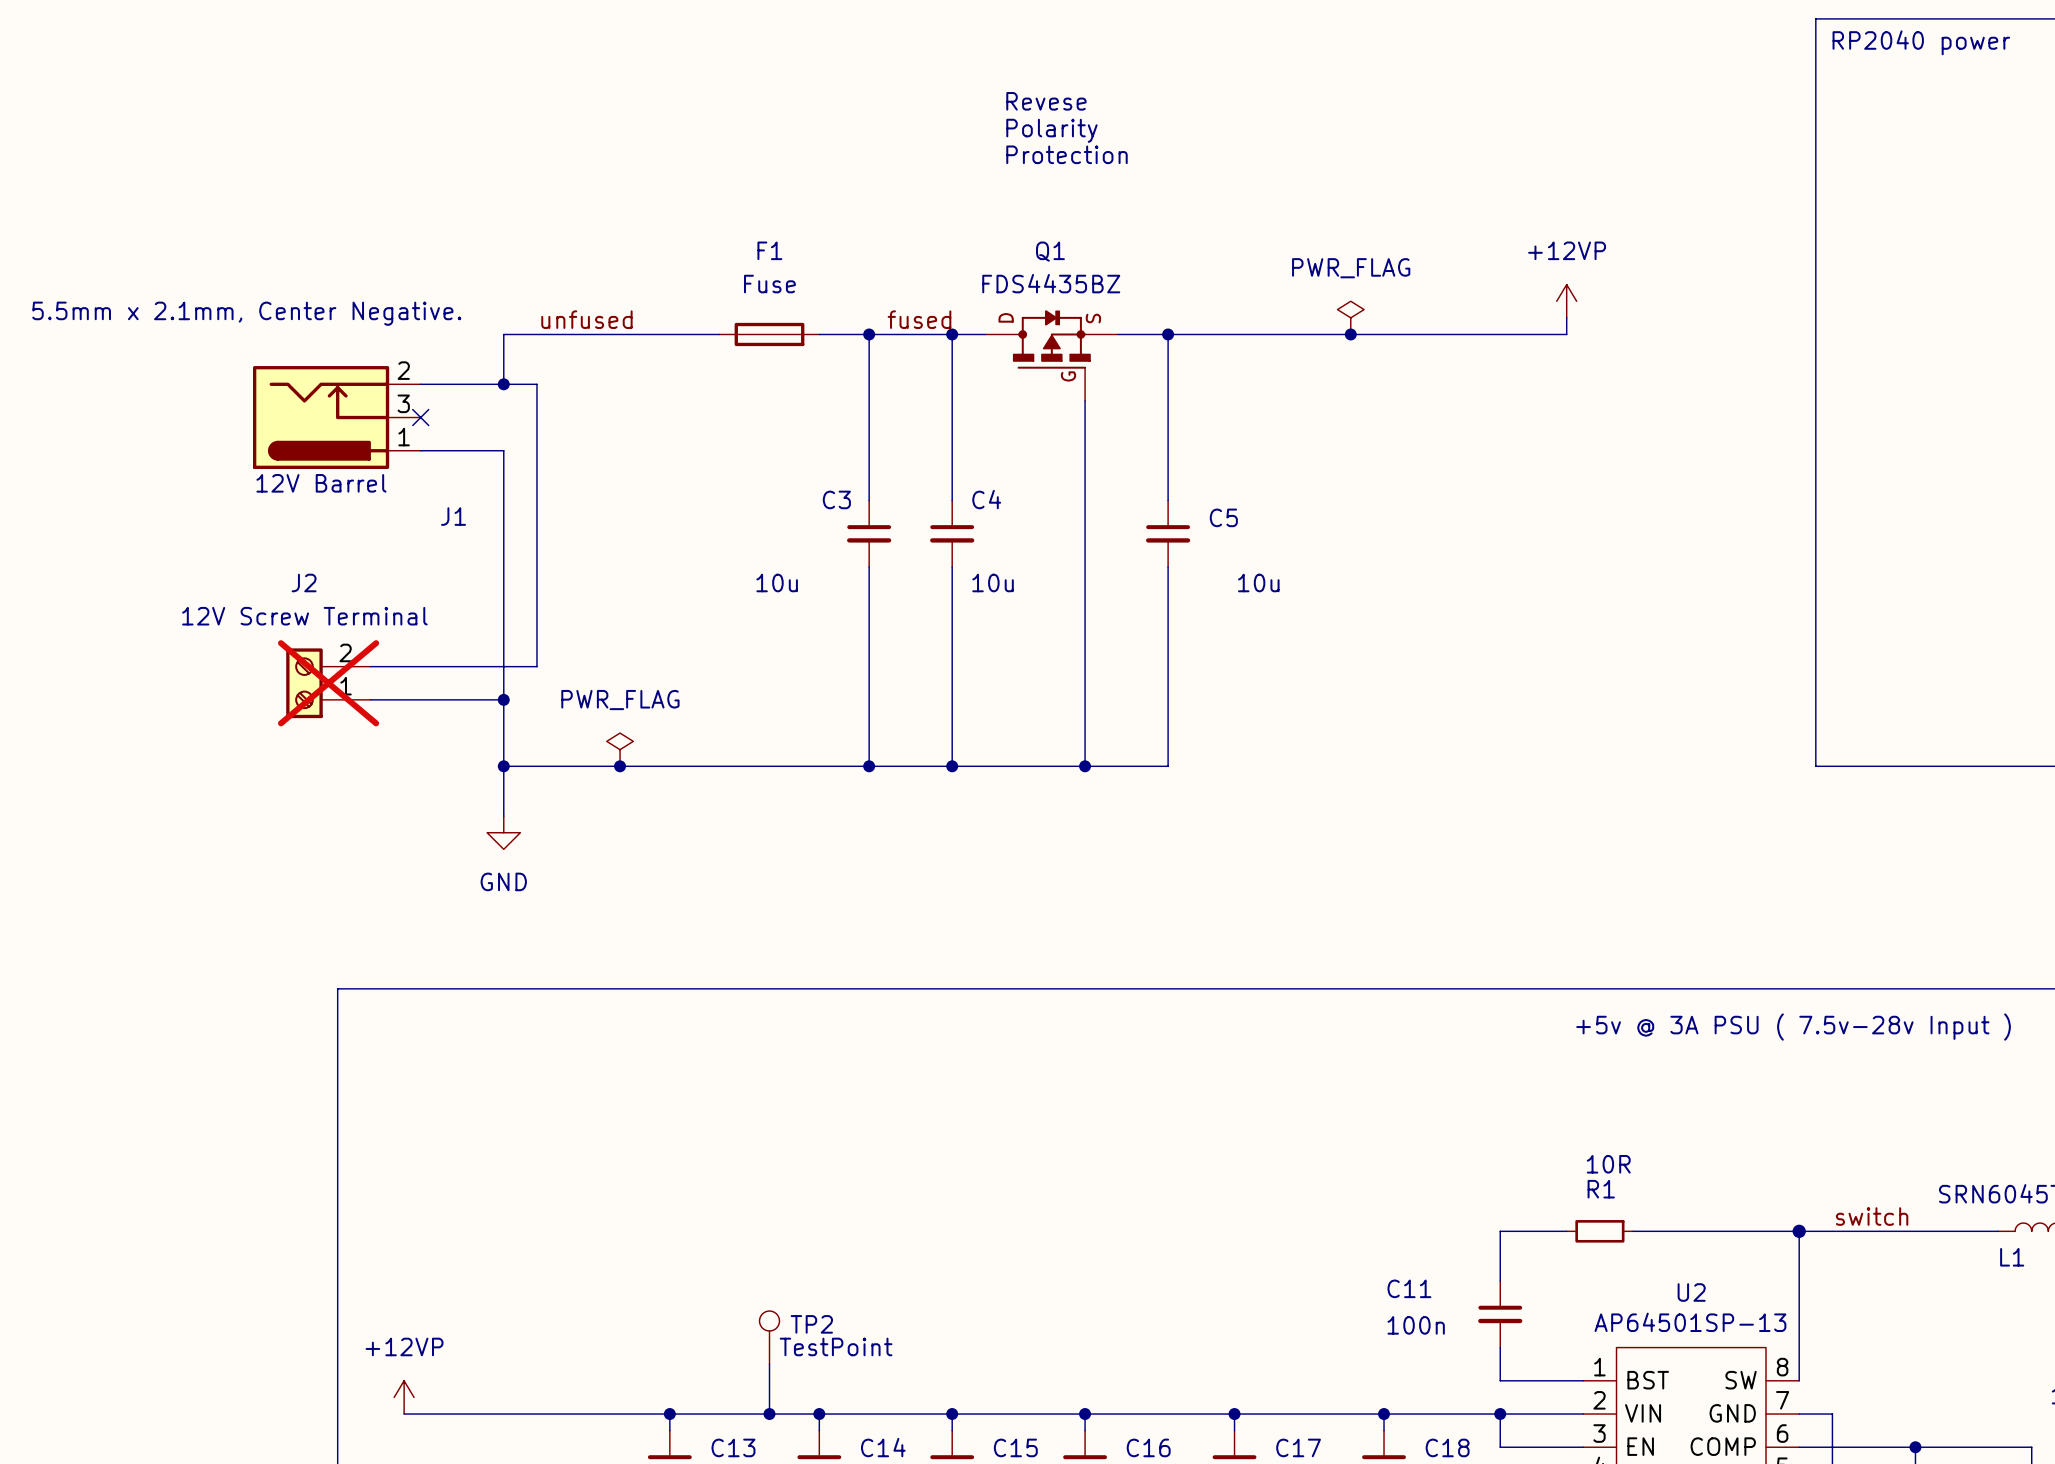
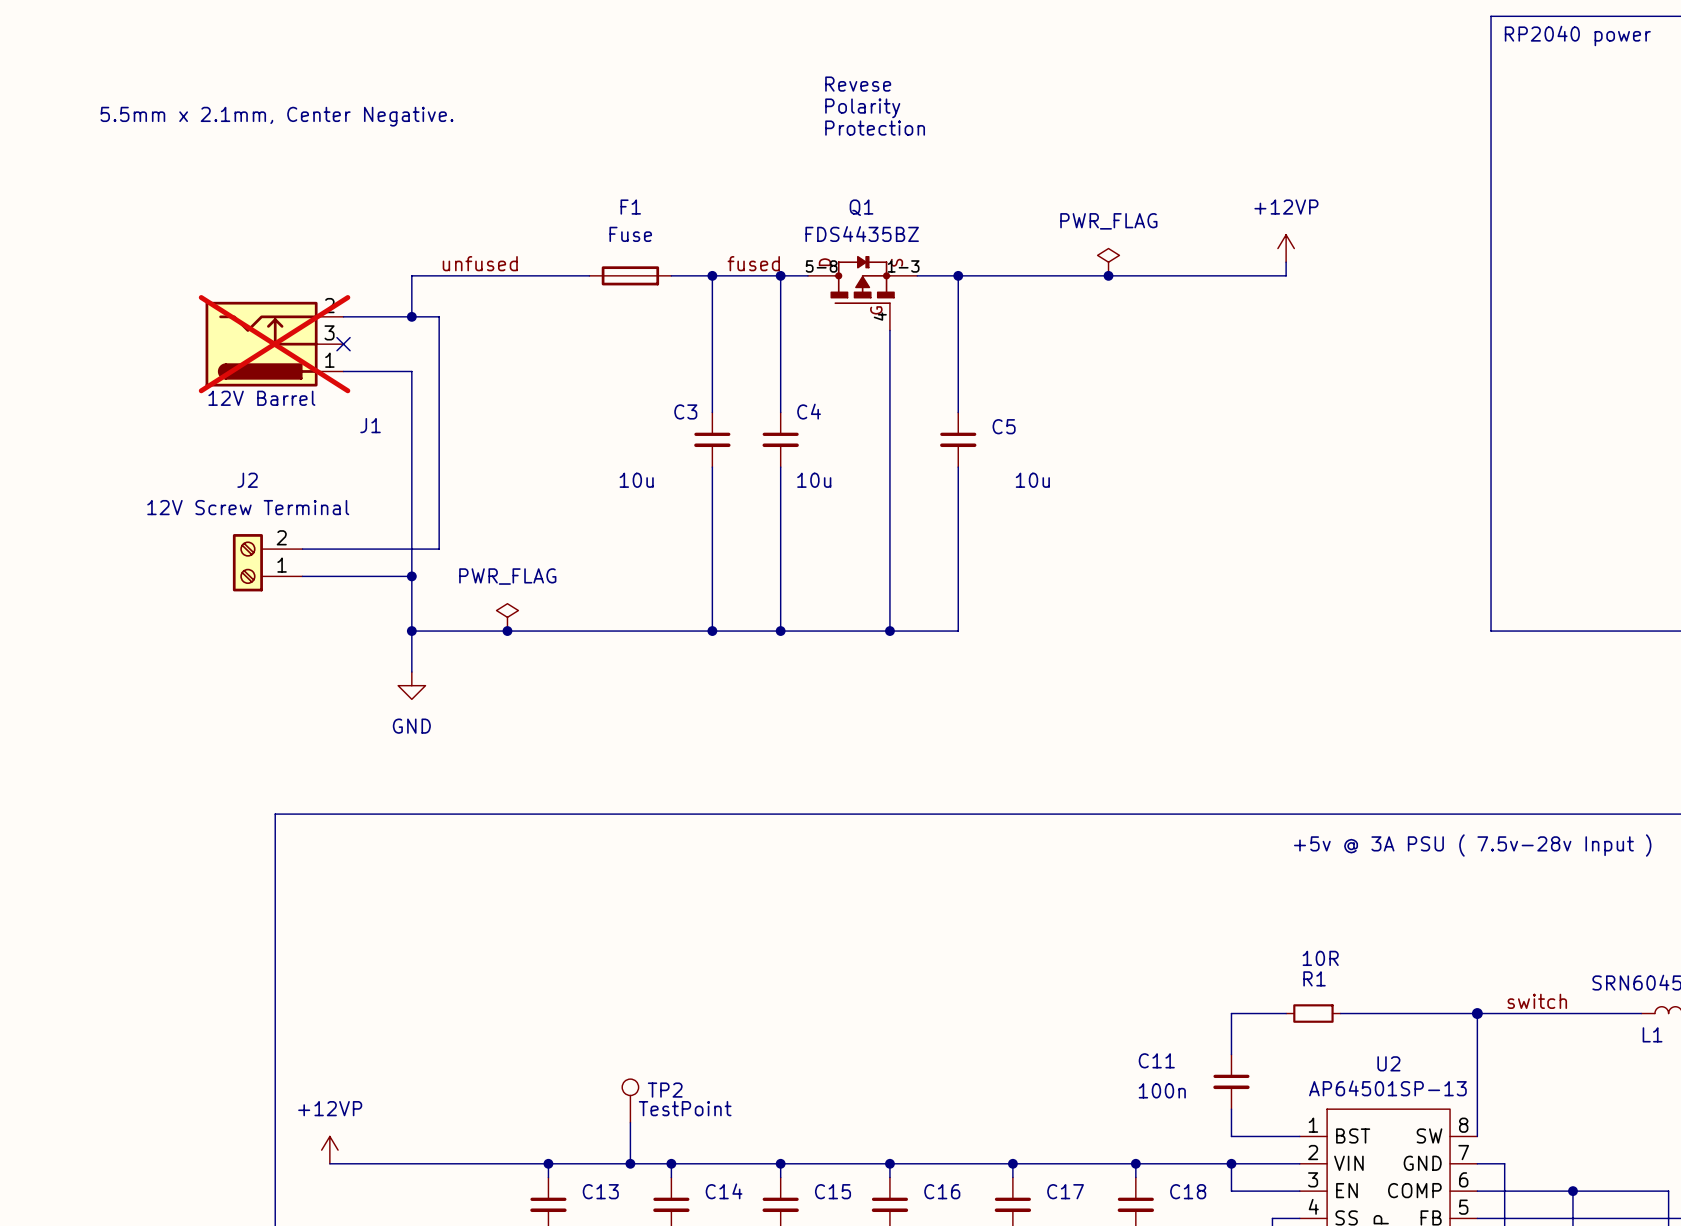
text position: 5.5mm x 2.1mm, Center Negative. (246, 313) -> 5.5mm x 2.1mm, Center Negative. (276, 116)
Q1 pin number: none -> 5-8 (821, 266)
Q1 pin number: none -> 1-3 (903, 266)
Q1 pin number: none -> 4 (880, 316)
J1 do-not-place cross: none -> (274, 344)
J2 do-not-place cross: (328, 683) -> none

